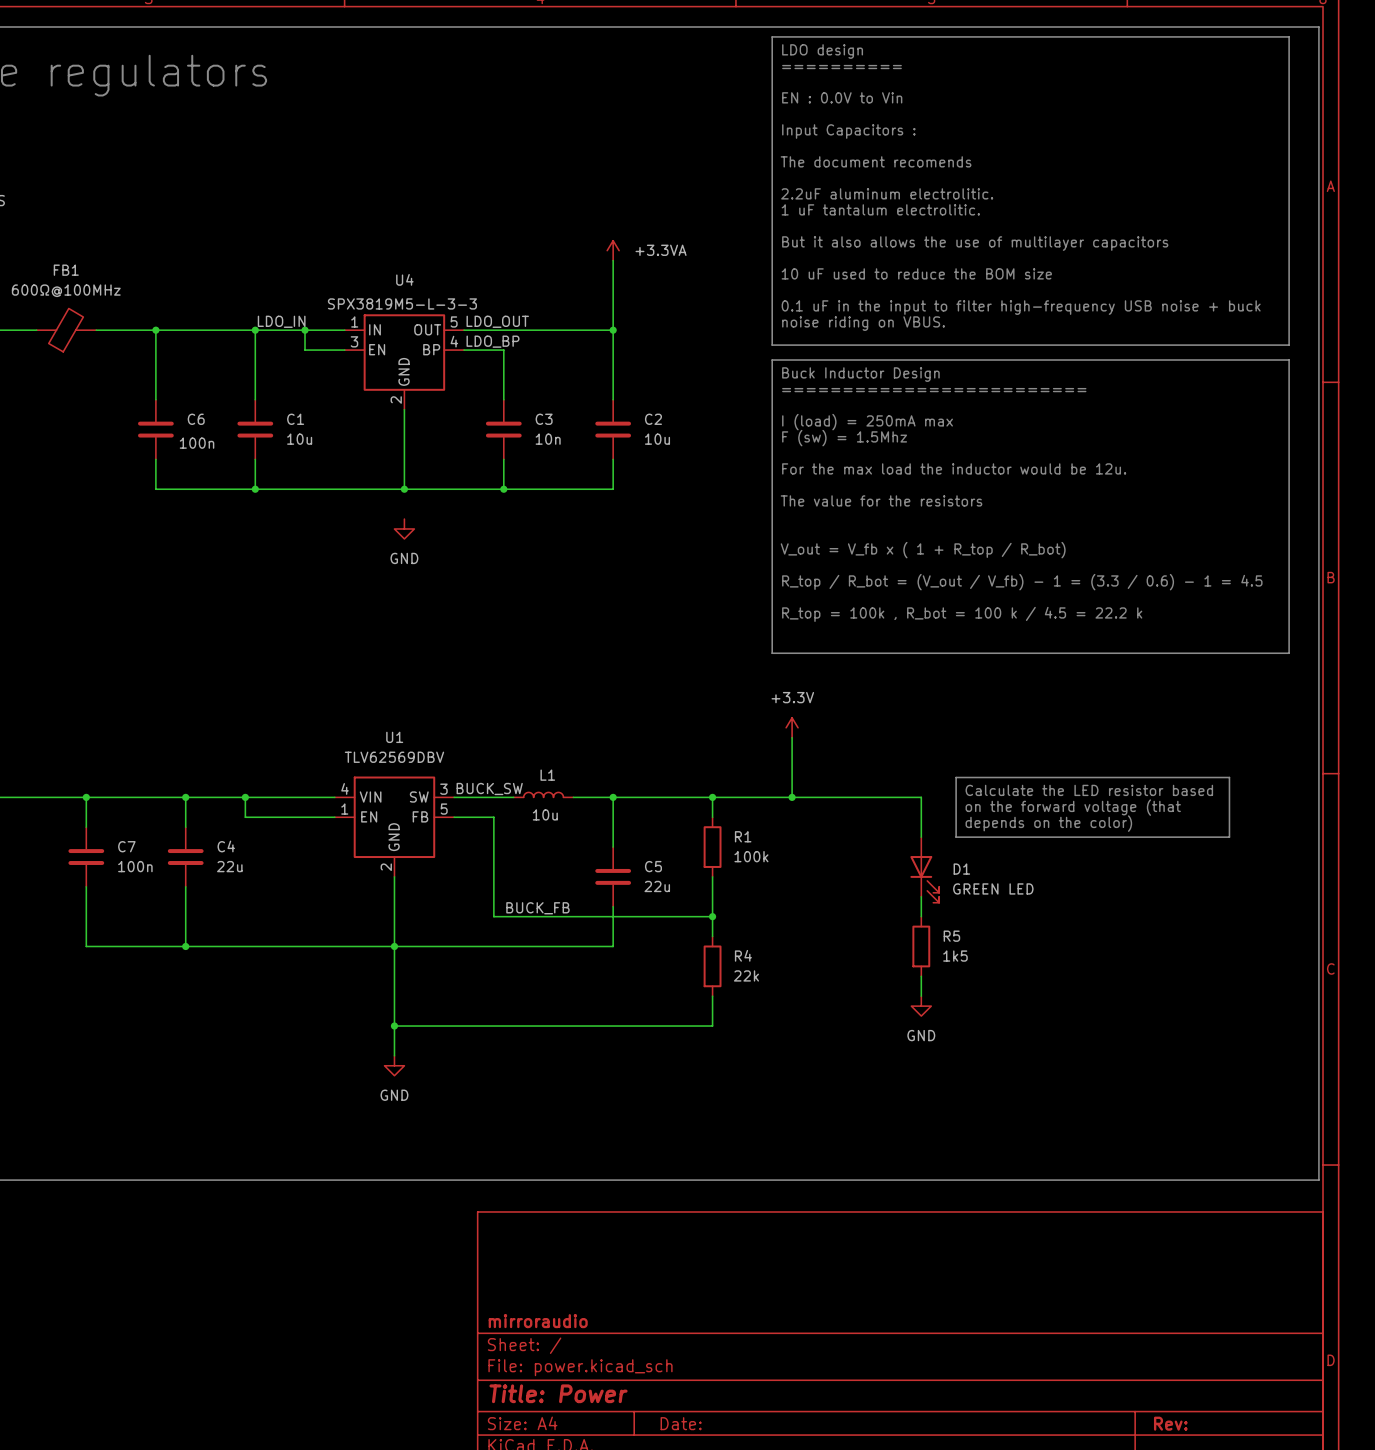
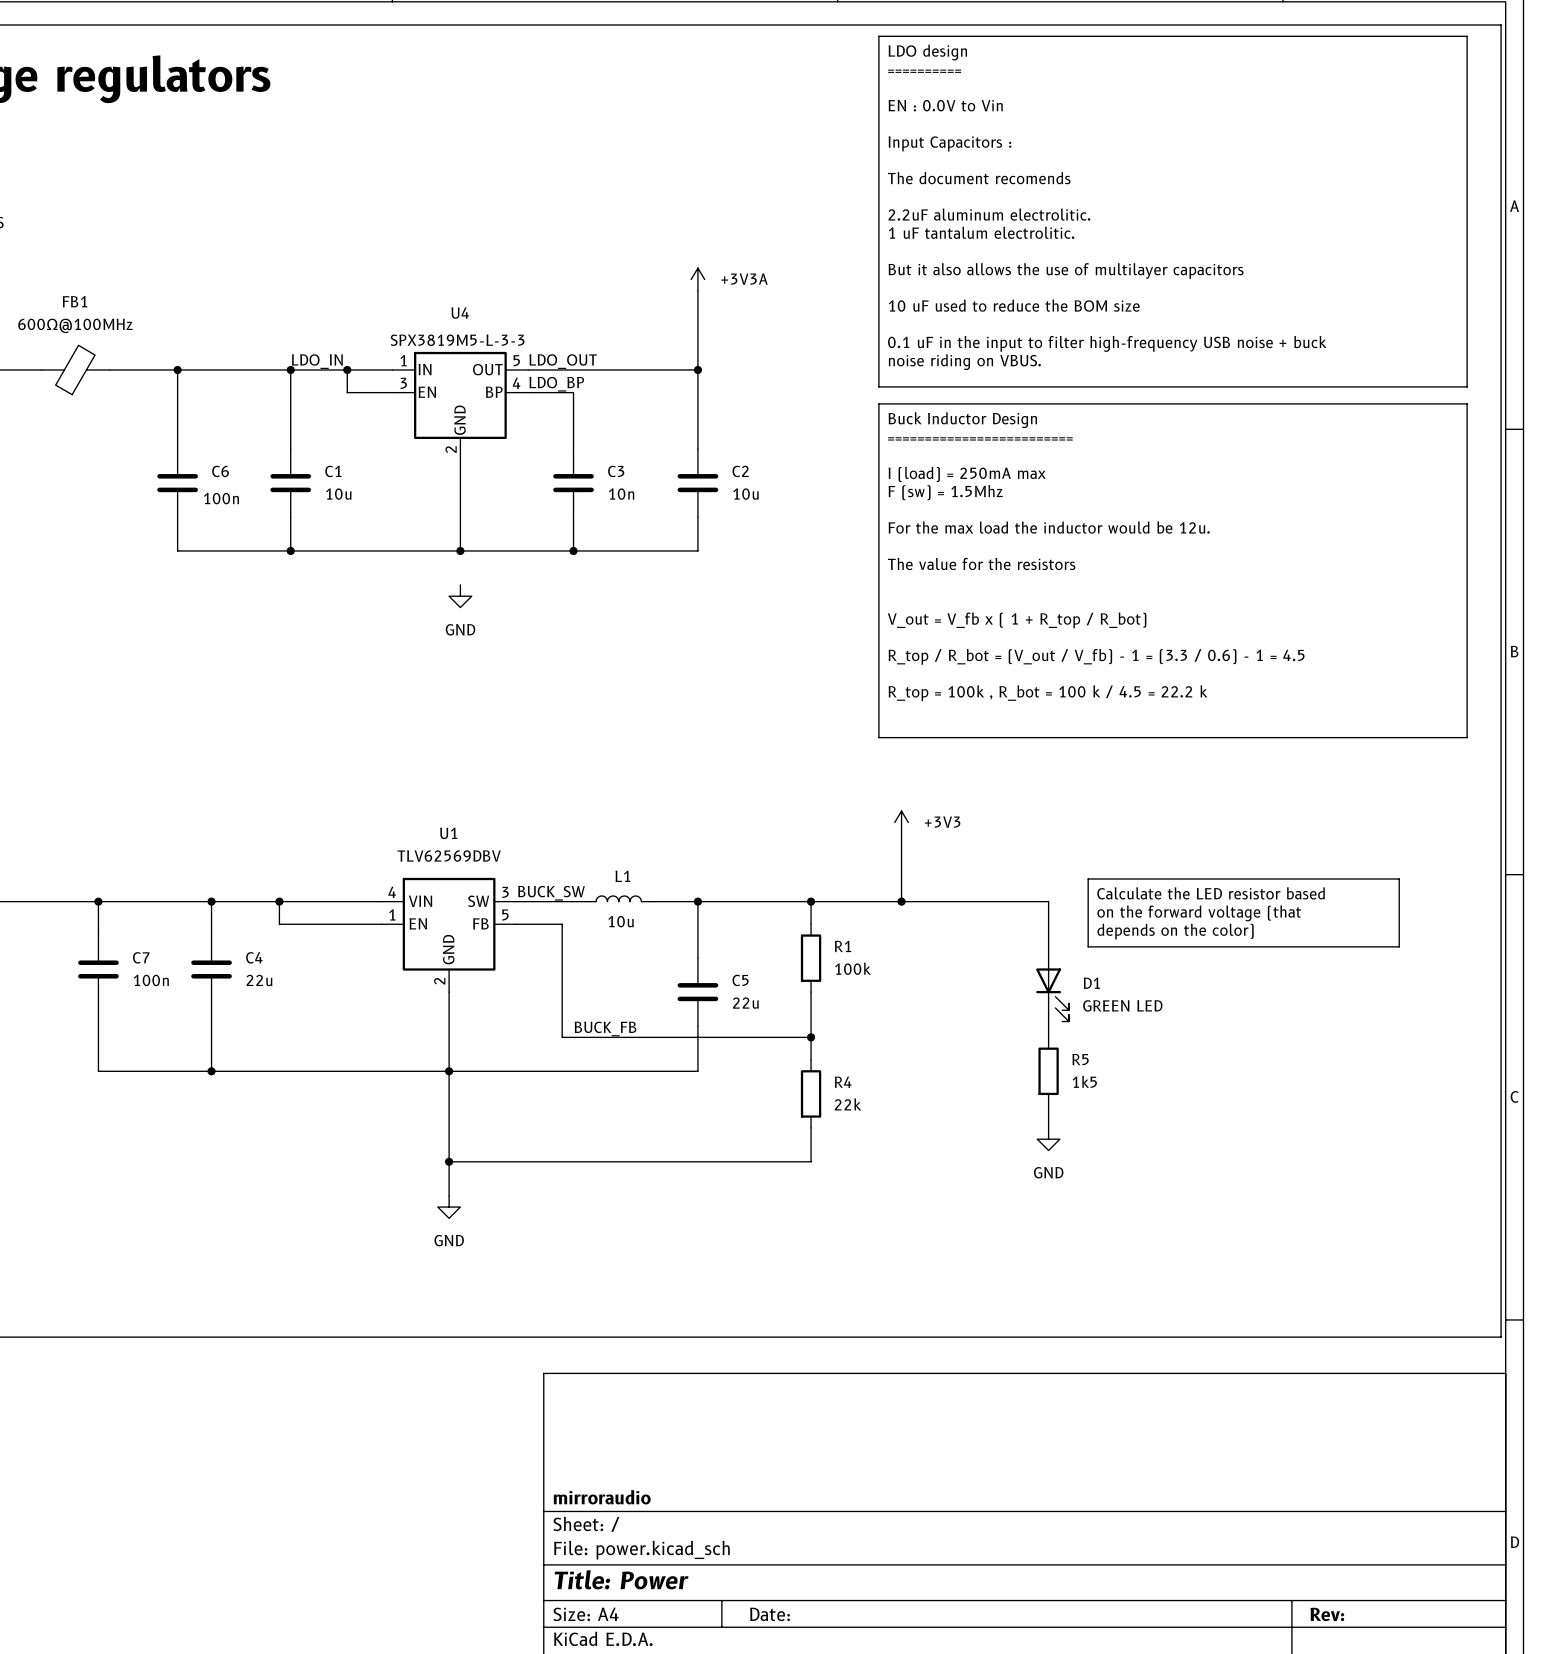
power symbol: +3.3VA (613, 250) -> +3V3A (697, 279)
power symbol: +3.3V (792, 727) -> +3V3 (901, 822)

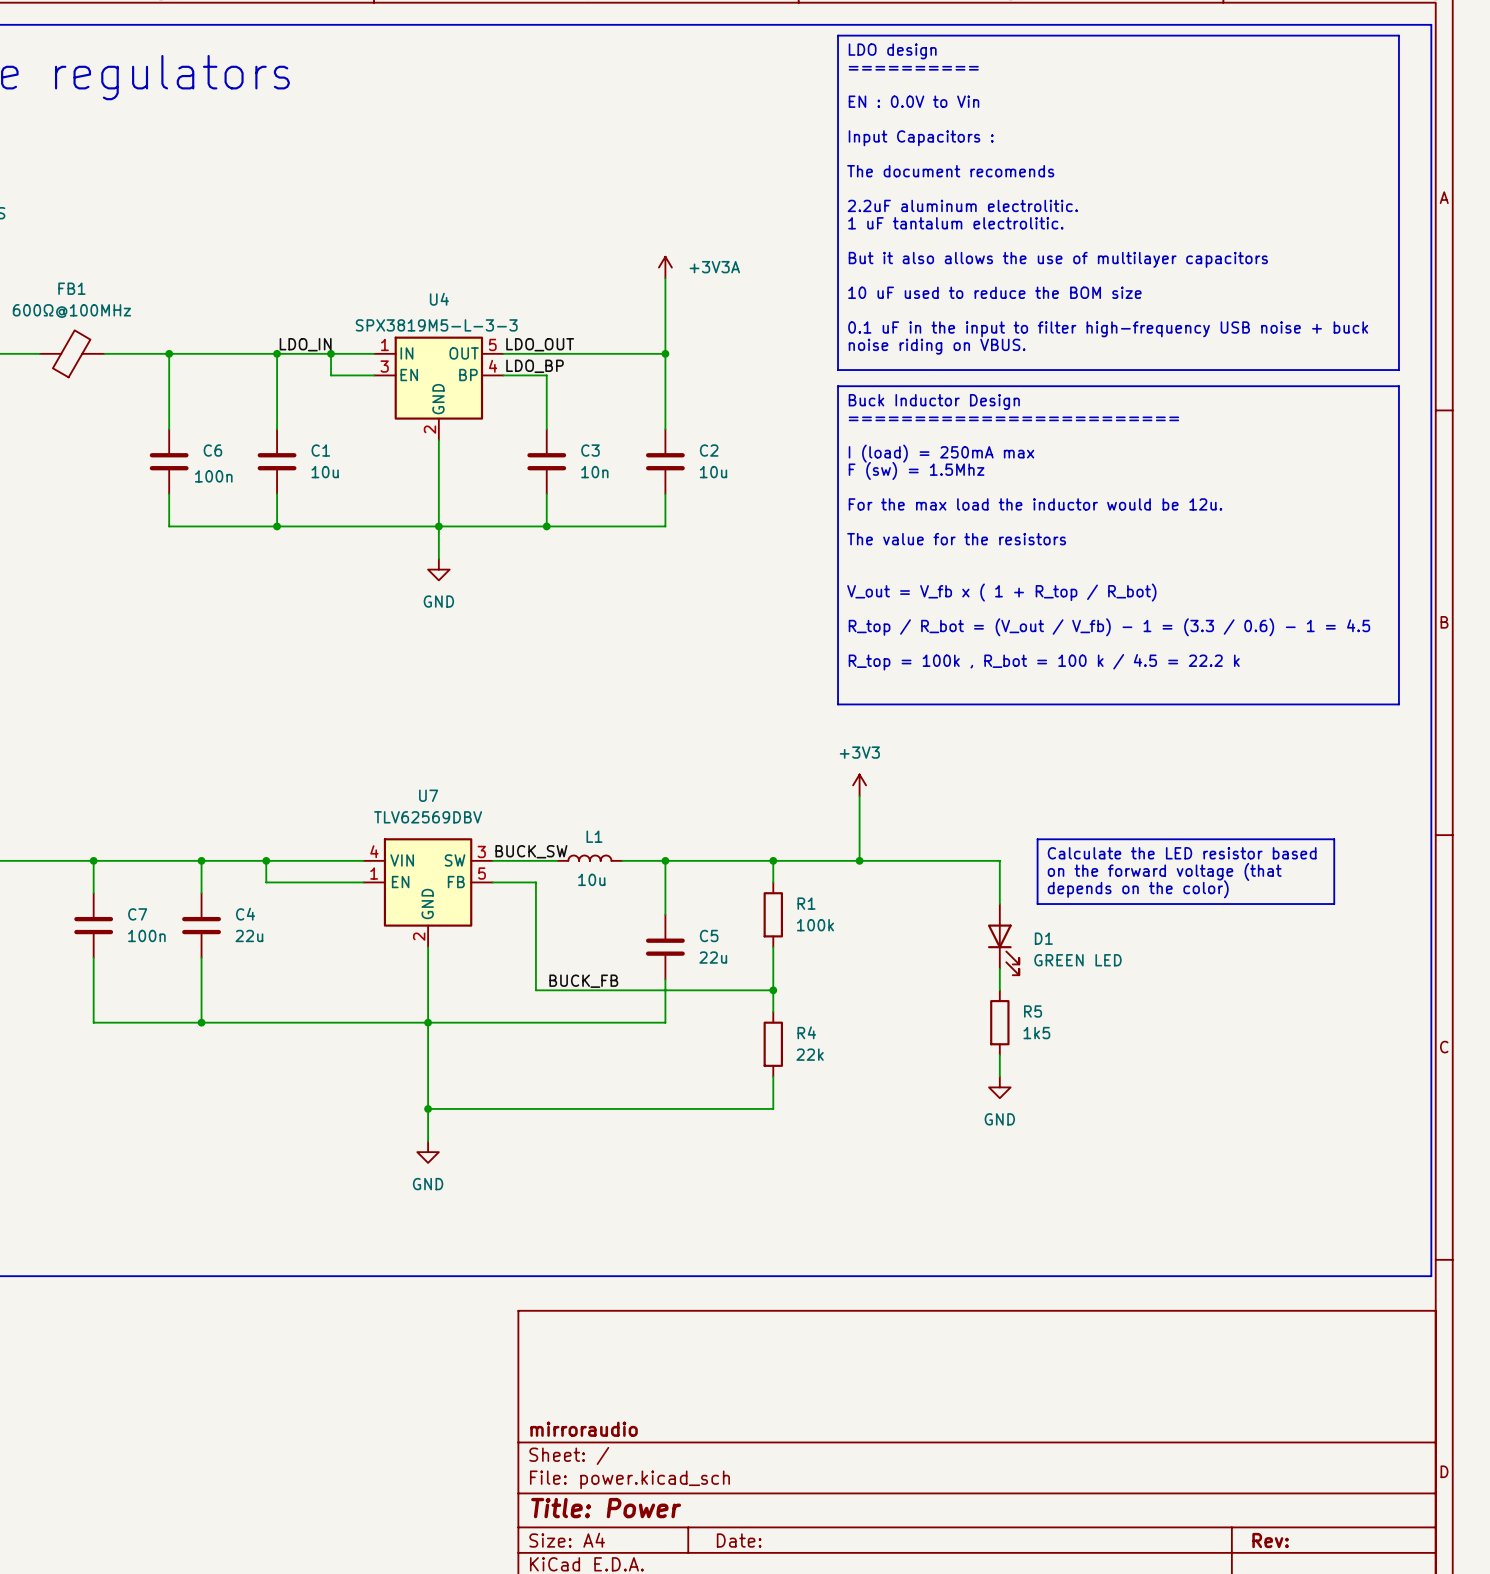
wire: none -> (438, 526) (438, 558)
power symbol text position: +3V3 (942, 822) -> +3V3 (859, 752)
U1 name: U1 (448, 833) -> U7 (428, 795)

